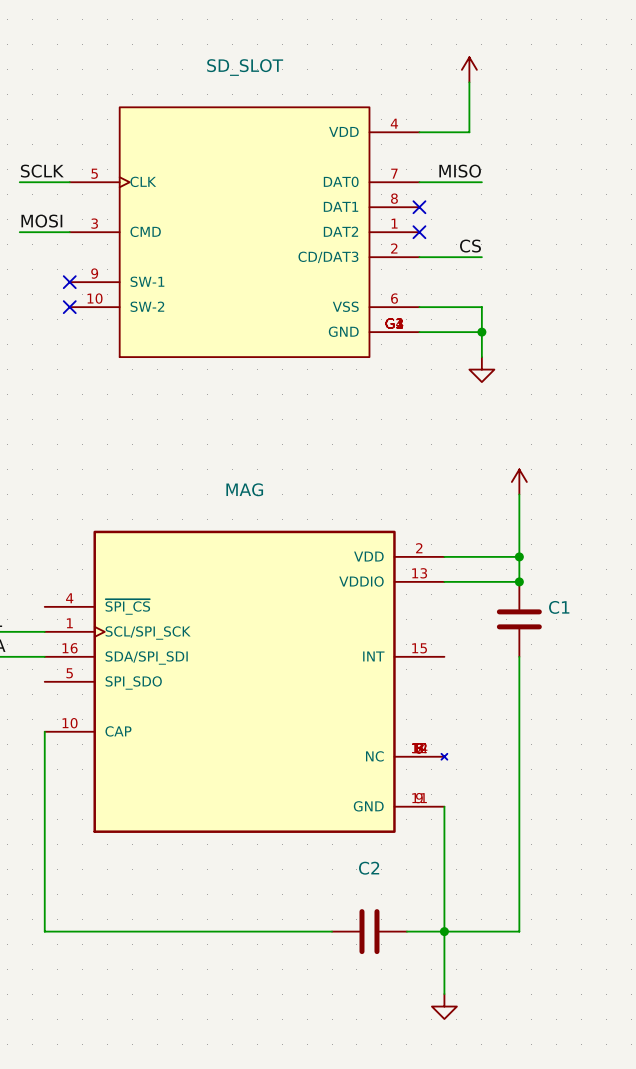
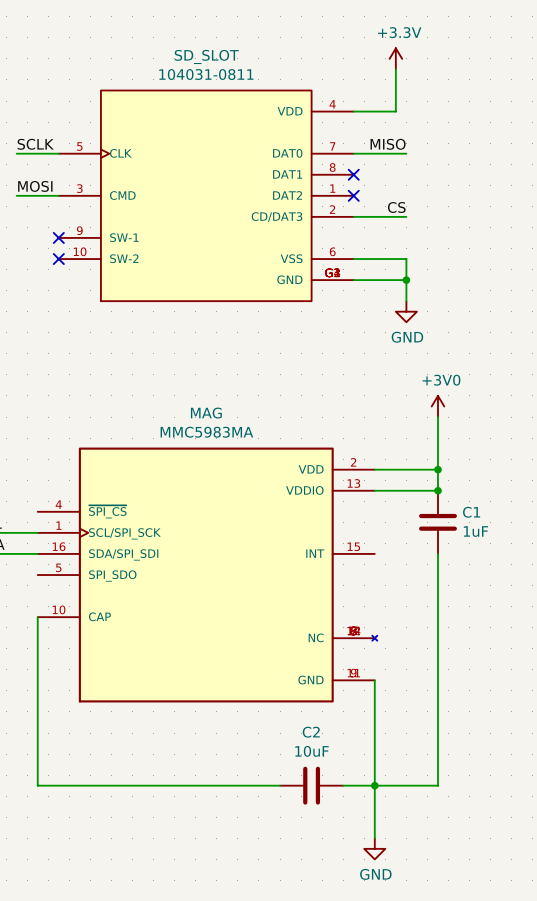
power symbol text: none -> +3.3V (399, 32)
SD_SLOT value: none -> 104031-0811 (206, 74)
power symbol text: none -> GND (407, 337)
power symbol text: none -> +3V0 (441, 380)
MAG value: none -> MMC5983MA (206, 432)
C1 value: none -> 1uF (475, 531)
C2 value: none -> 10uF (311, 751)
power symbol text: none -> GND (375, 874)

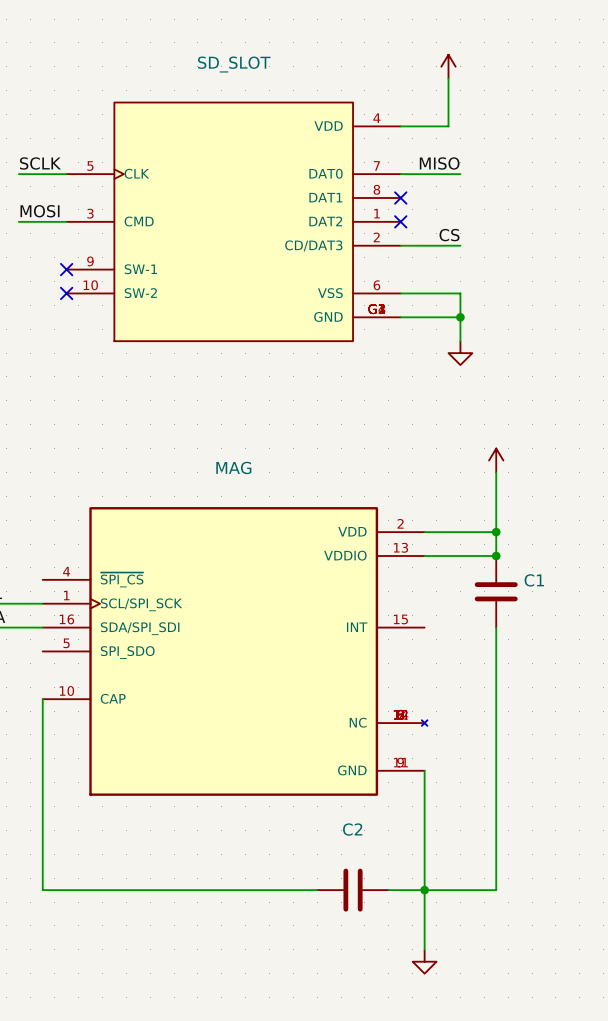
power symbol text: +3.3V (399, 32) -> none
SD_SLOT value: 104031-0811 (206, 74) -> none
power symbol text: GND (407, 337) -> none
power symbol text: +3V0 (441, 380) -> none
MAG value: MMC5983MA (206, 432) -> none
C1 value: 1uF (475, 531) -> none
C2 value: 10uF (311, 751) -> none
power symbol text: GND (375, 874) -> none

